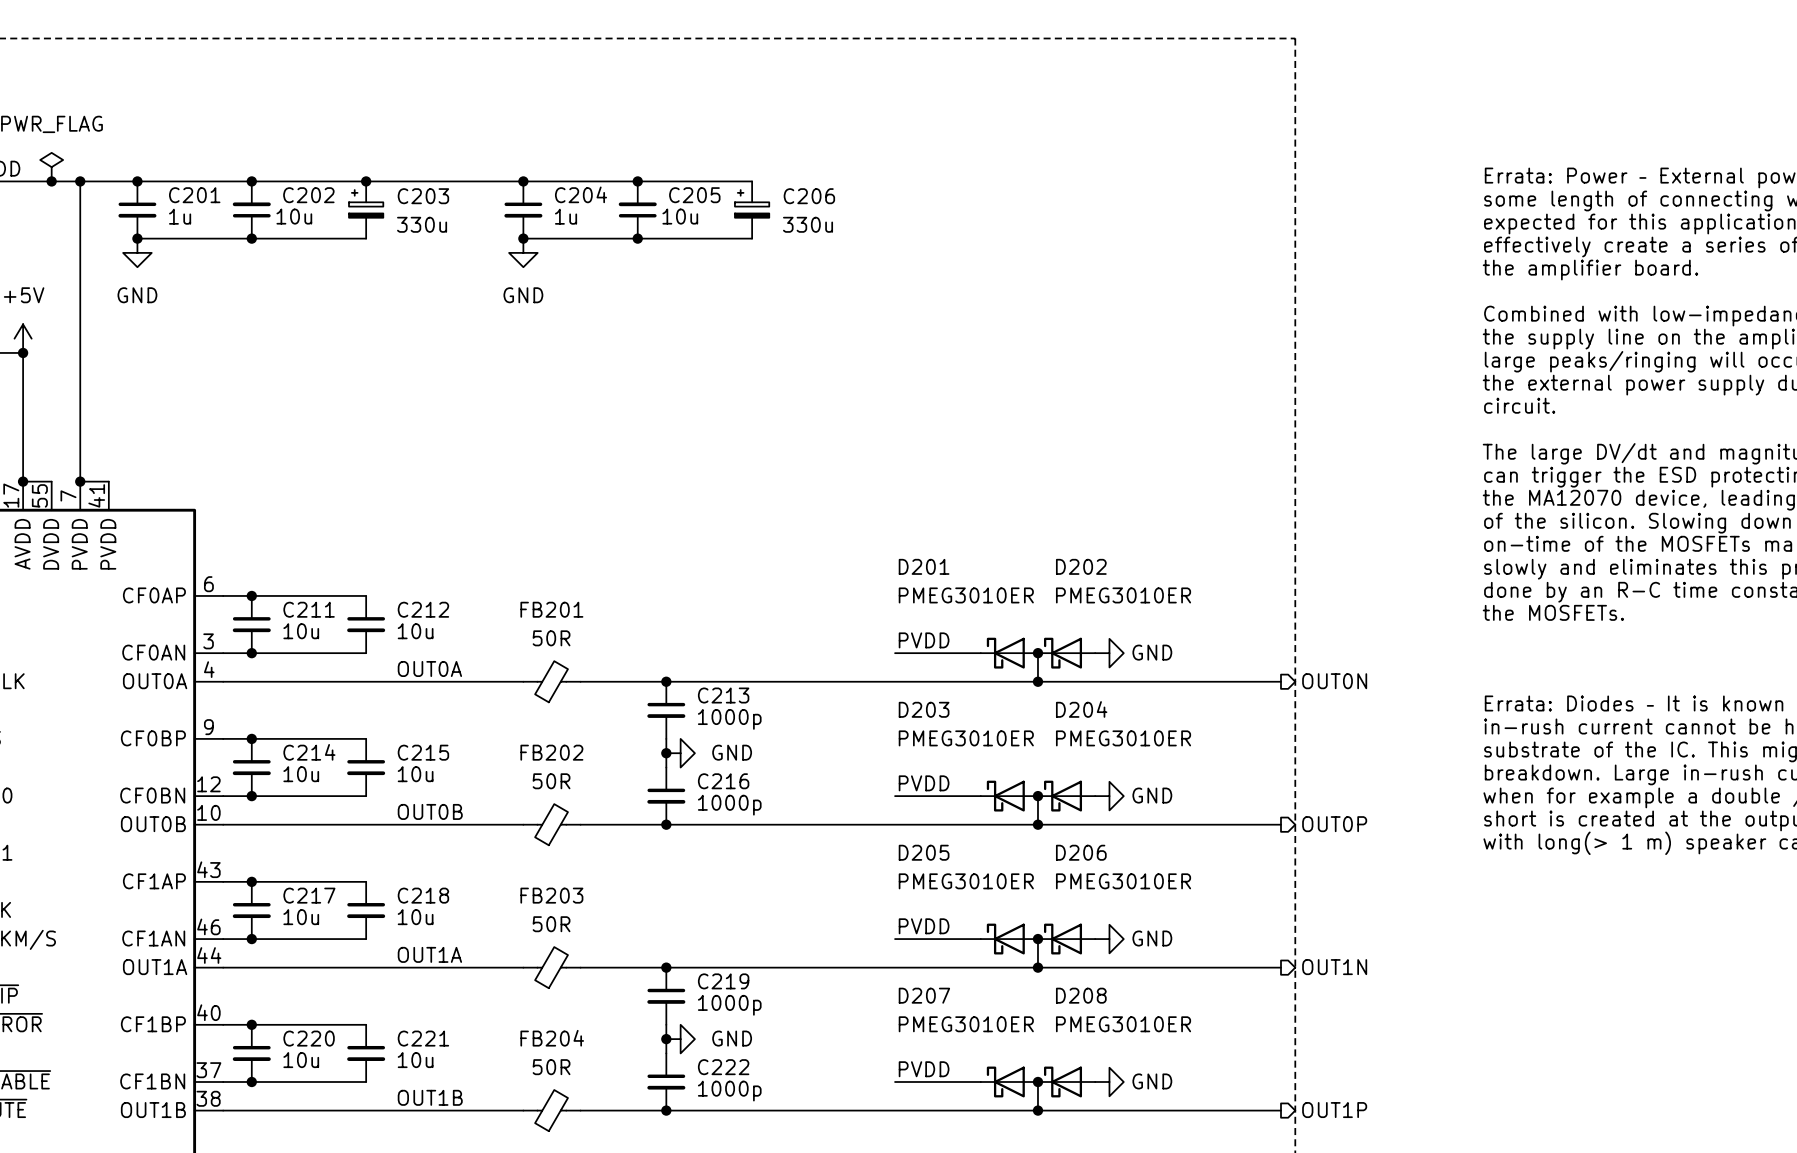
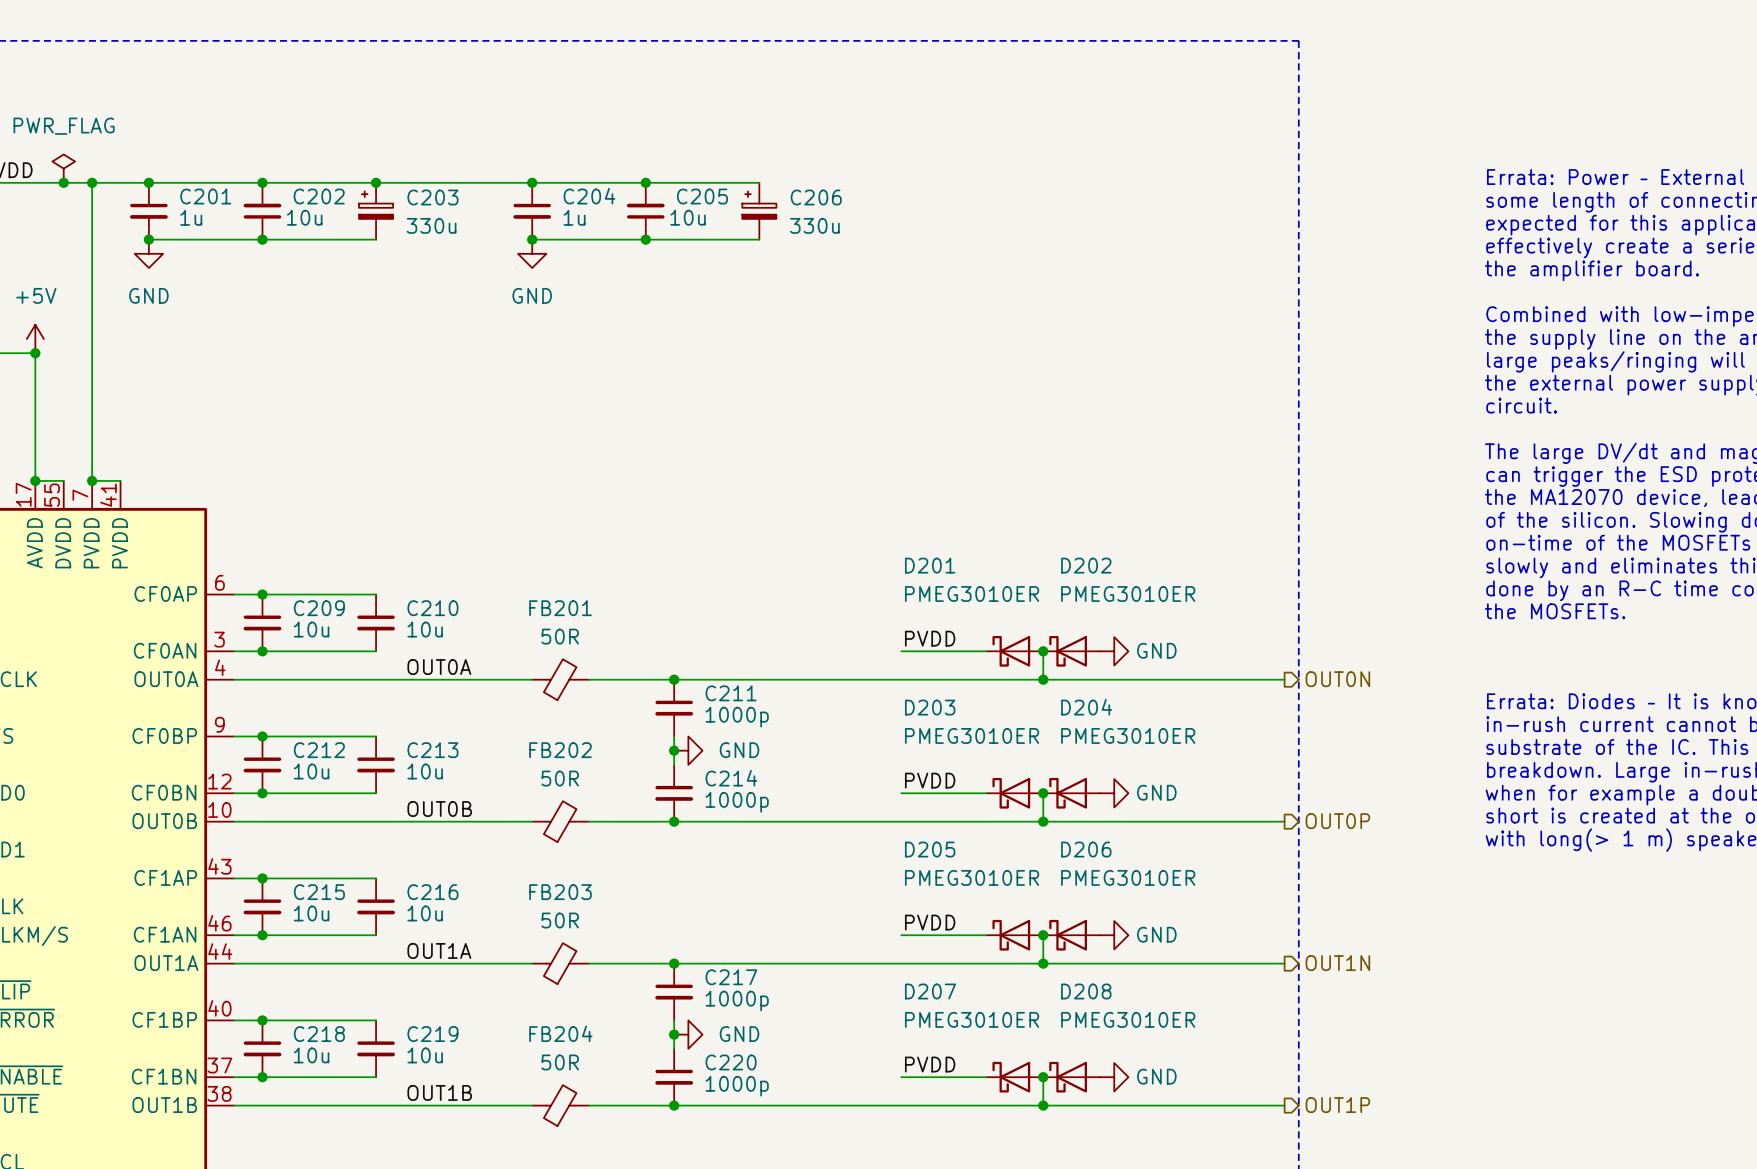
C211 name: C211 (309, 609) -> C209 (319, 608)
C212 name: C212 (423, 609) -> C210 (432, 608)
C213 name: C213 (723, 695) -> C211 (731, 693)
C214 name: C214 (309, 752) -> C212 (319, 750)
C215 name: C215 (423, 752) -> C213 (432, 750)
C216 name: C216 (723, 781) -> C214 (731, 778)
C217 name: C217 (309, 895) -> C215 (319, 892)
C218 name: C218 (423, 895) -> C216 (432, 892)
C219 name: C219 (723, 981) -> C217 (731, 977)
C220 name: C220 (309, 1038) -> C218 (319, 1034)
C221 name: C221 (423, 1038) -> C219 (432, 1034)
C222 name: C222 (723, 1067) -> C220 (731, 1062)

